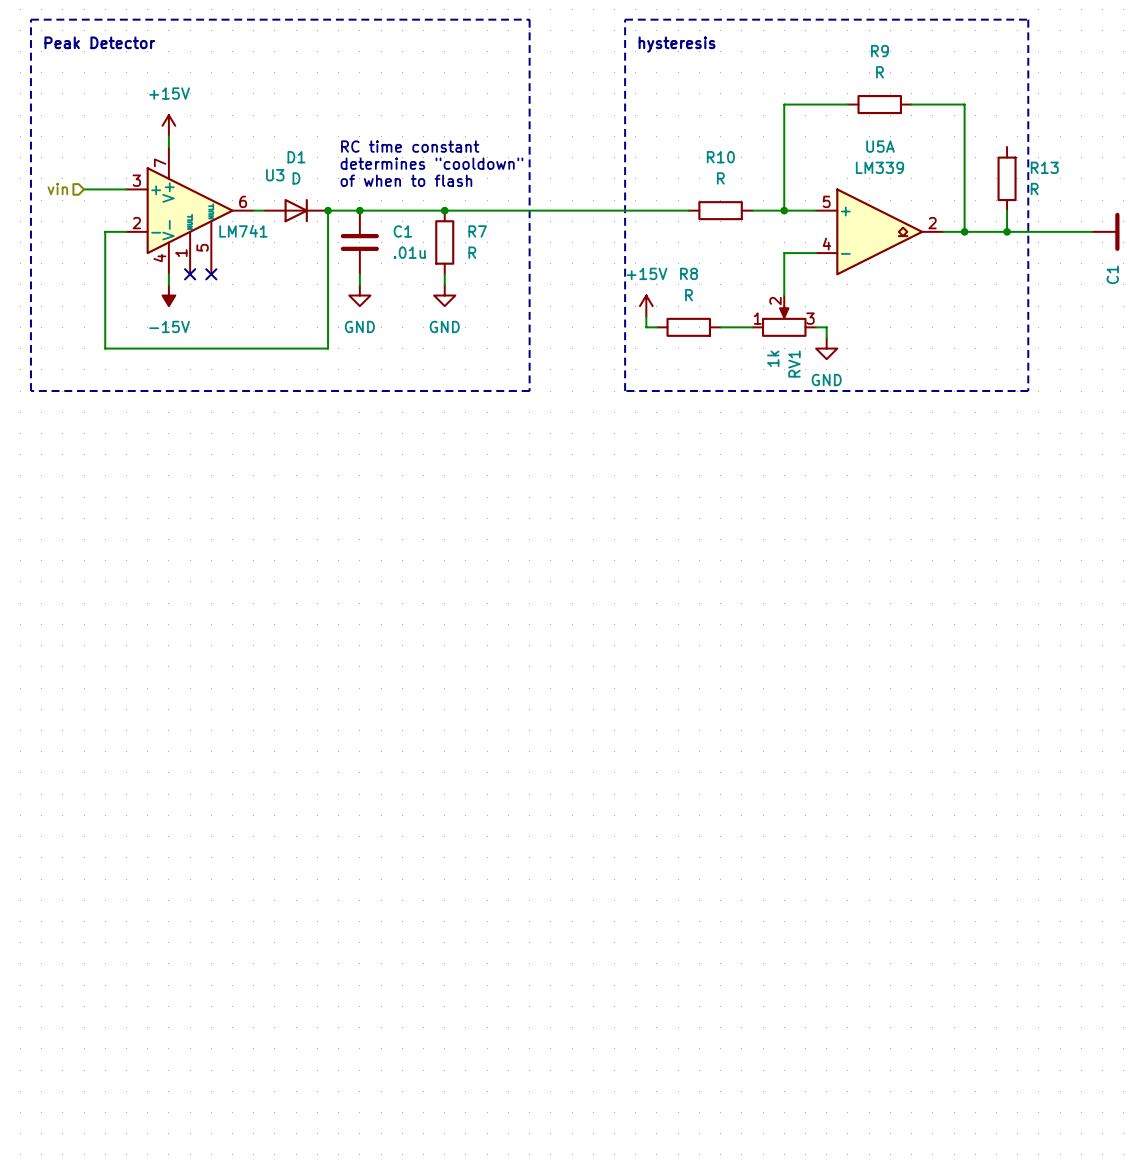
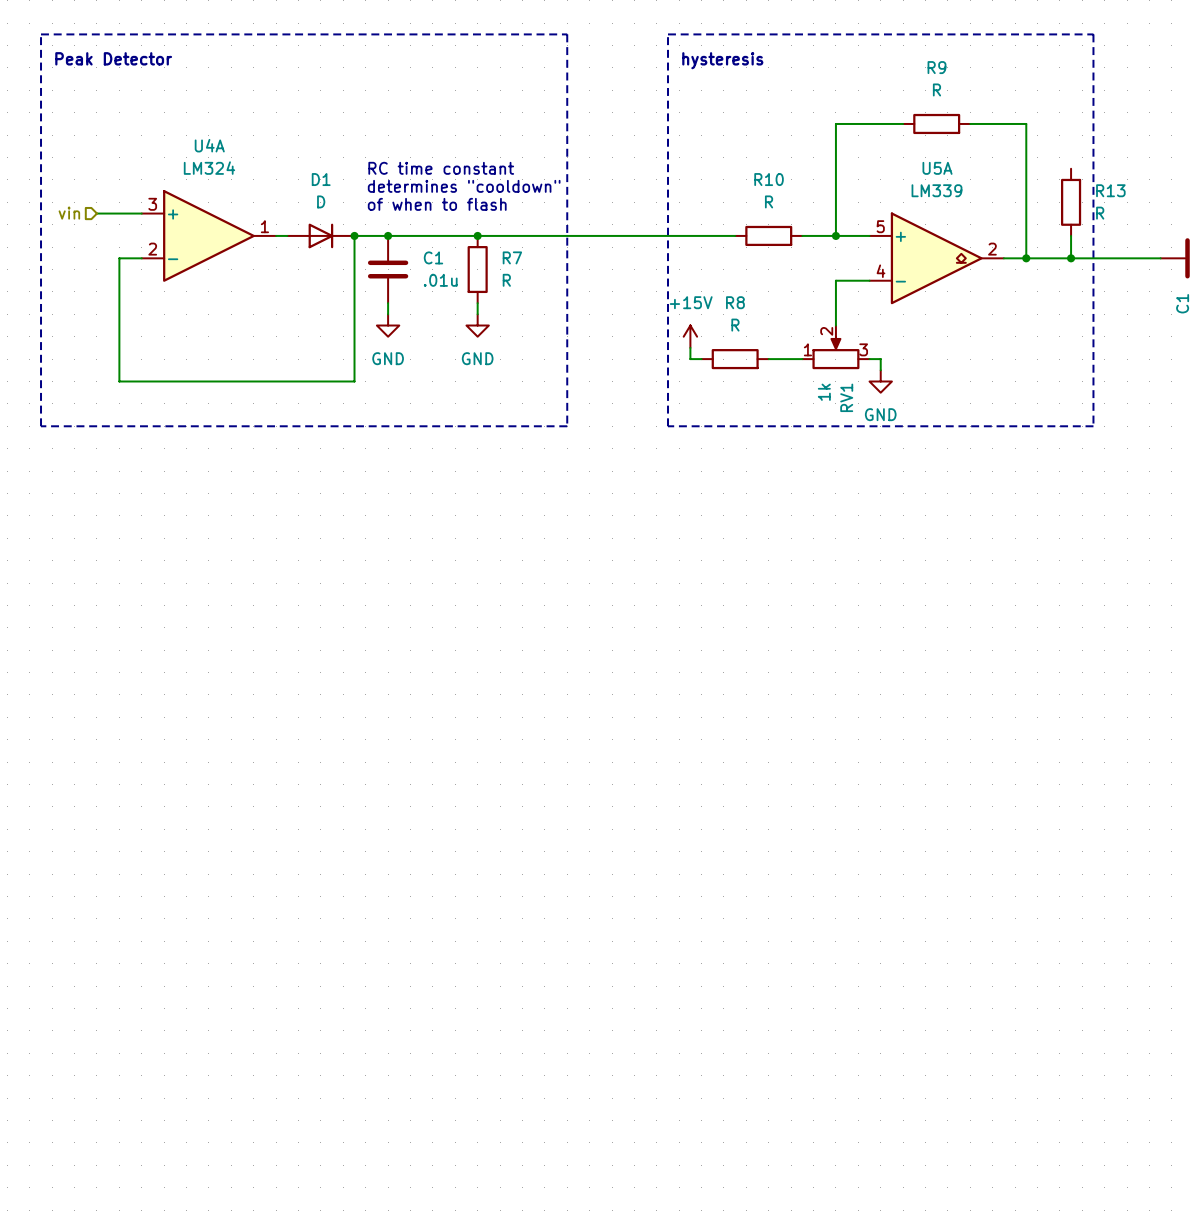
power symbol: +15V (168, 125) -> none
wire: (168, 136) (168, 146) -> none
U3: LM741 (190, 210) -> none
U4A: none -> LM324 (208, 235)
wire: (168, 274) (168, 284) -> none
no-connect mark: (190, 274) -> none
no-connect mark: (211, 274) -> none
power symbol: -15V (168, 295) -> none

